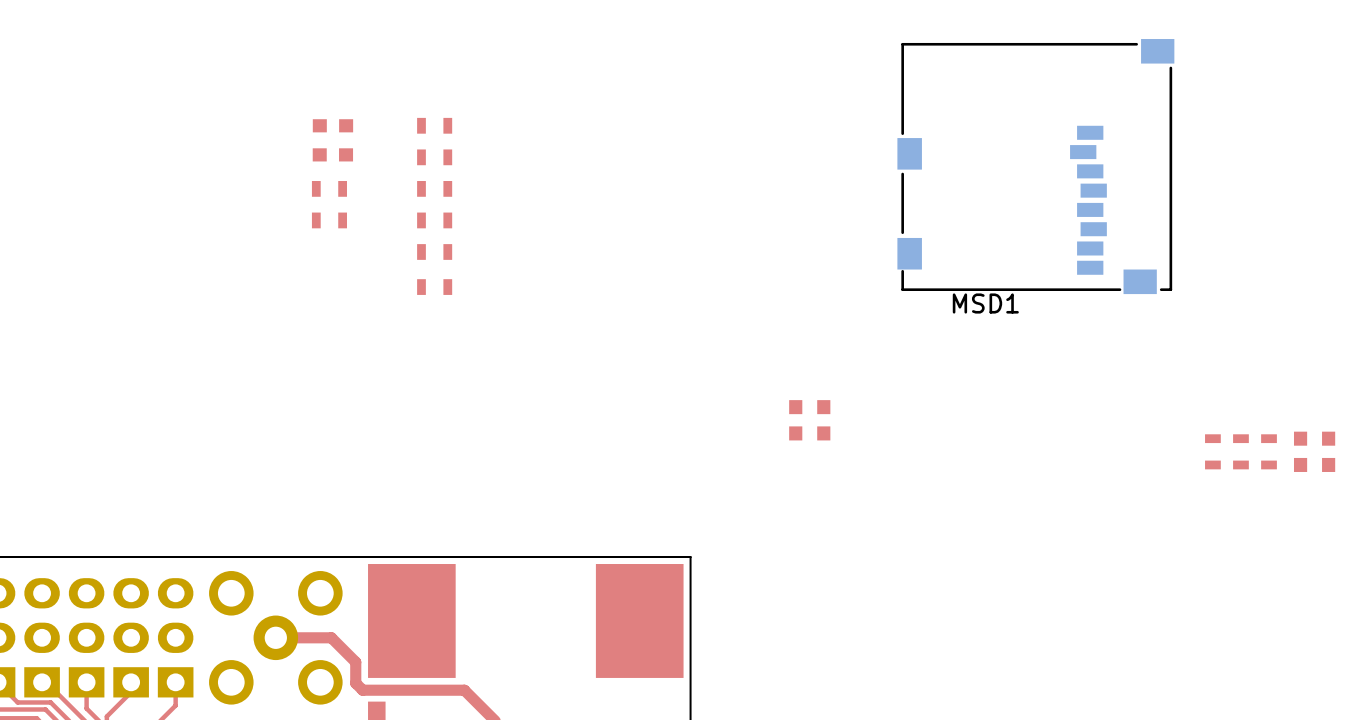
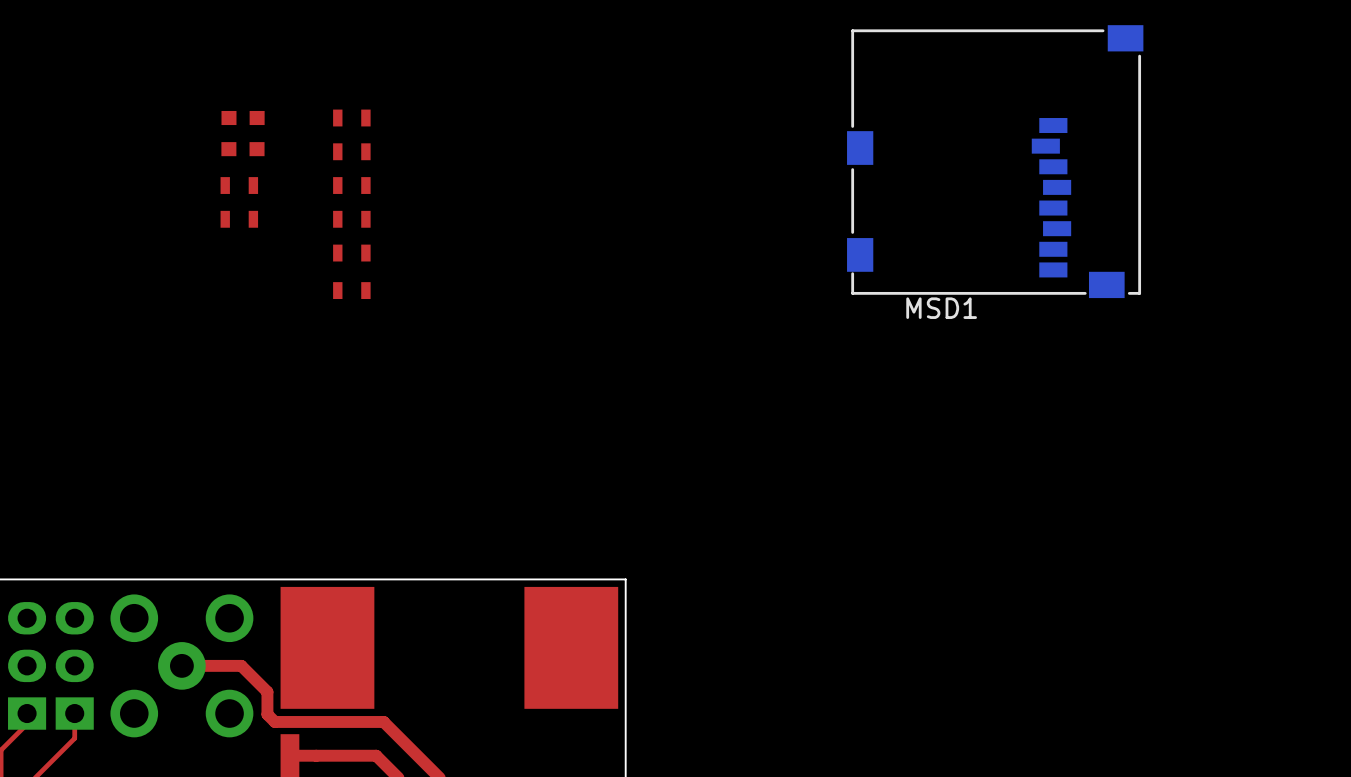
part: (795, 420) -> none
part: (823, 420) -> none
part: (1212, 451) -> none
part: (1240, 451) -> none
part: (1269, 451) -> none
part: (1300, 451) -> none
part: (1328, 451) -> none

